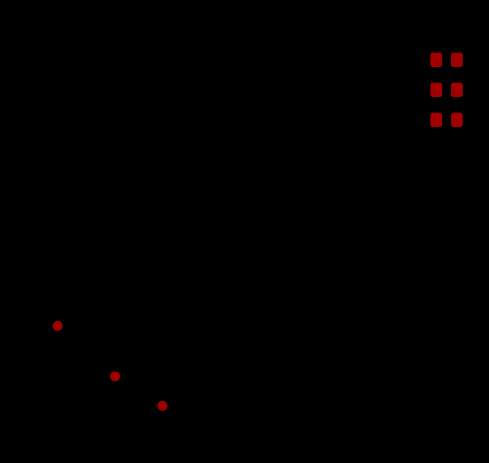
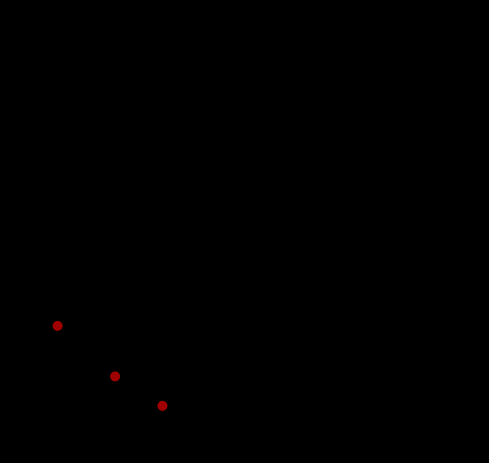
part: (446, 59) -> none
part: (446, 89) -> none
part: (446, 119) -> none

